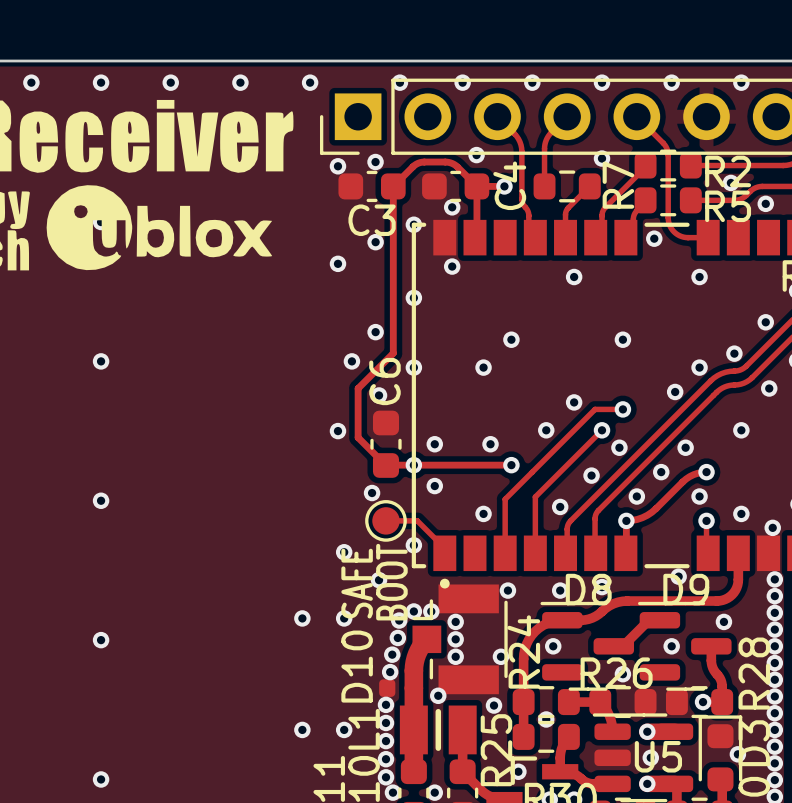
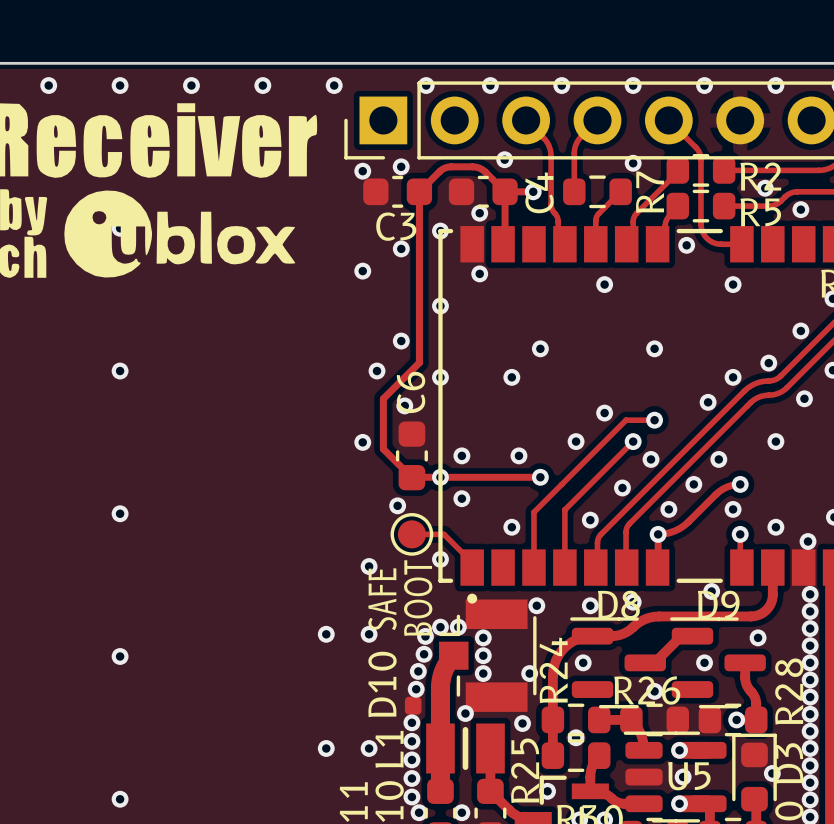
via: (379, 580) -> none

